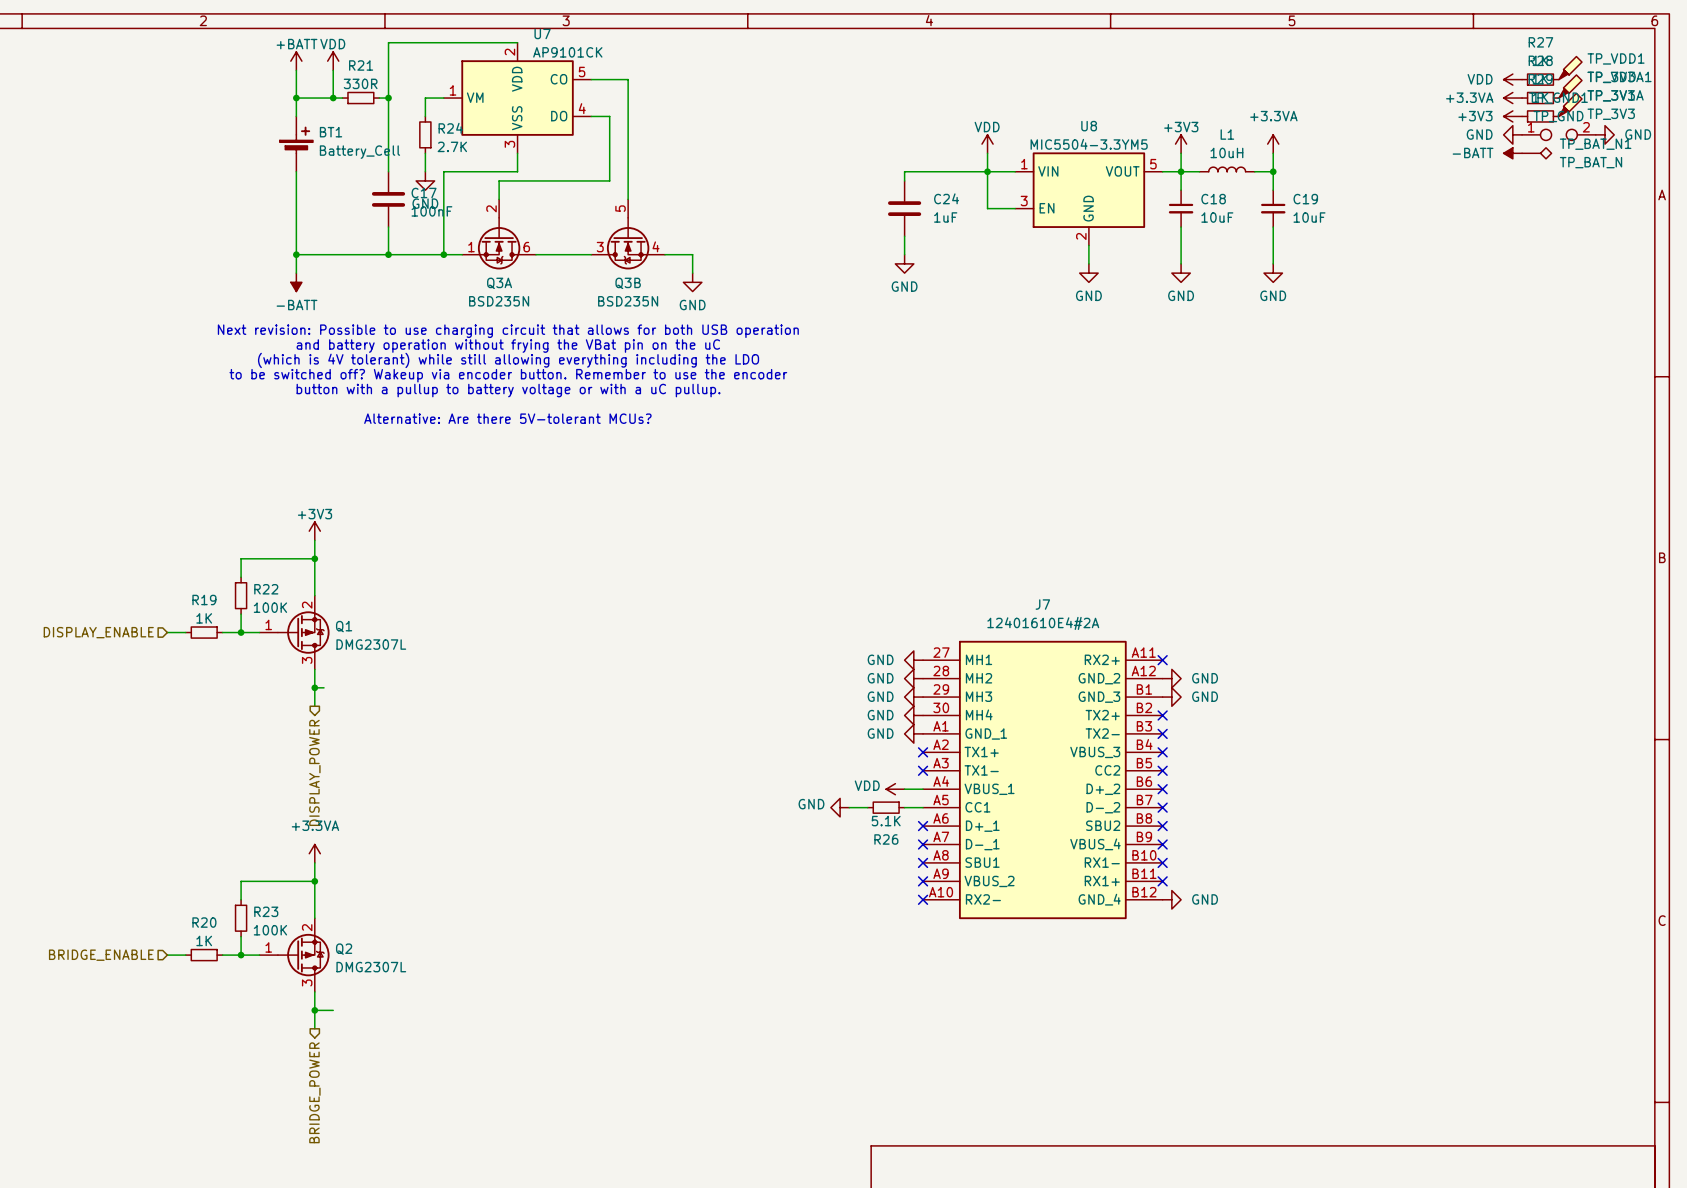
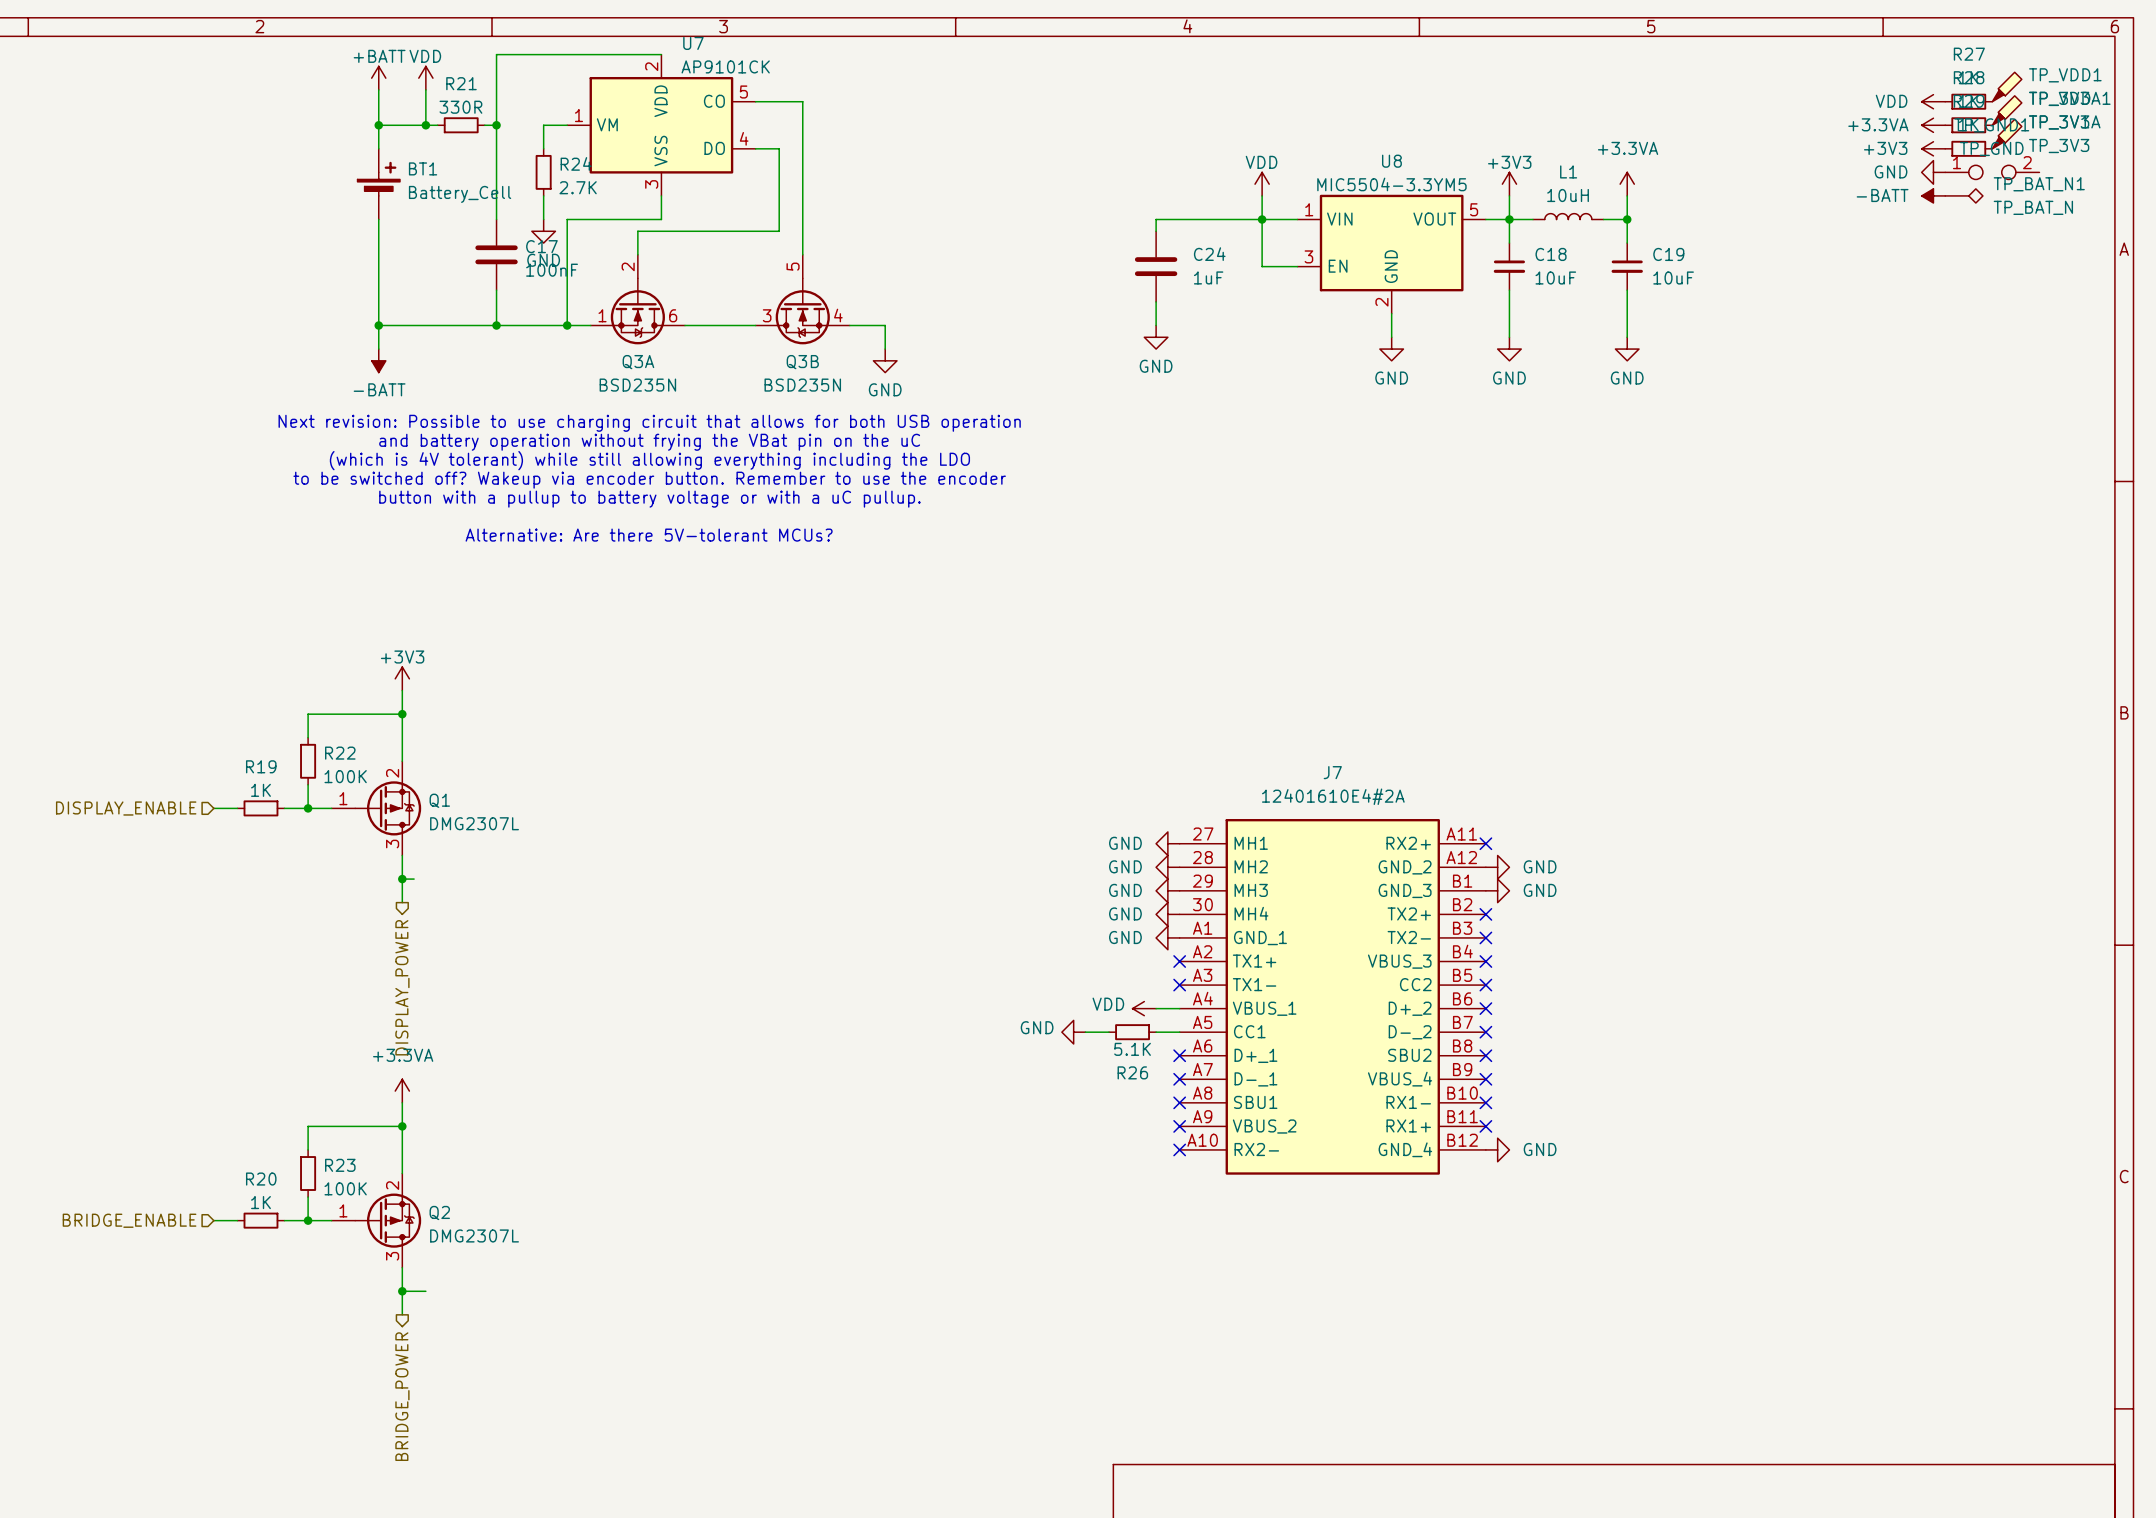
power symbol: GND (1605, 134) -> none

